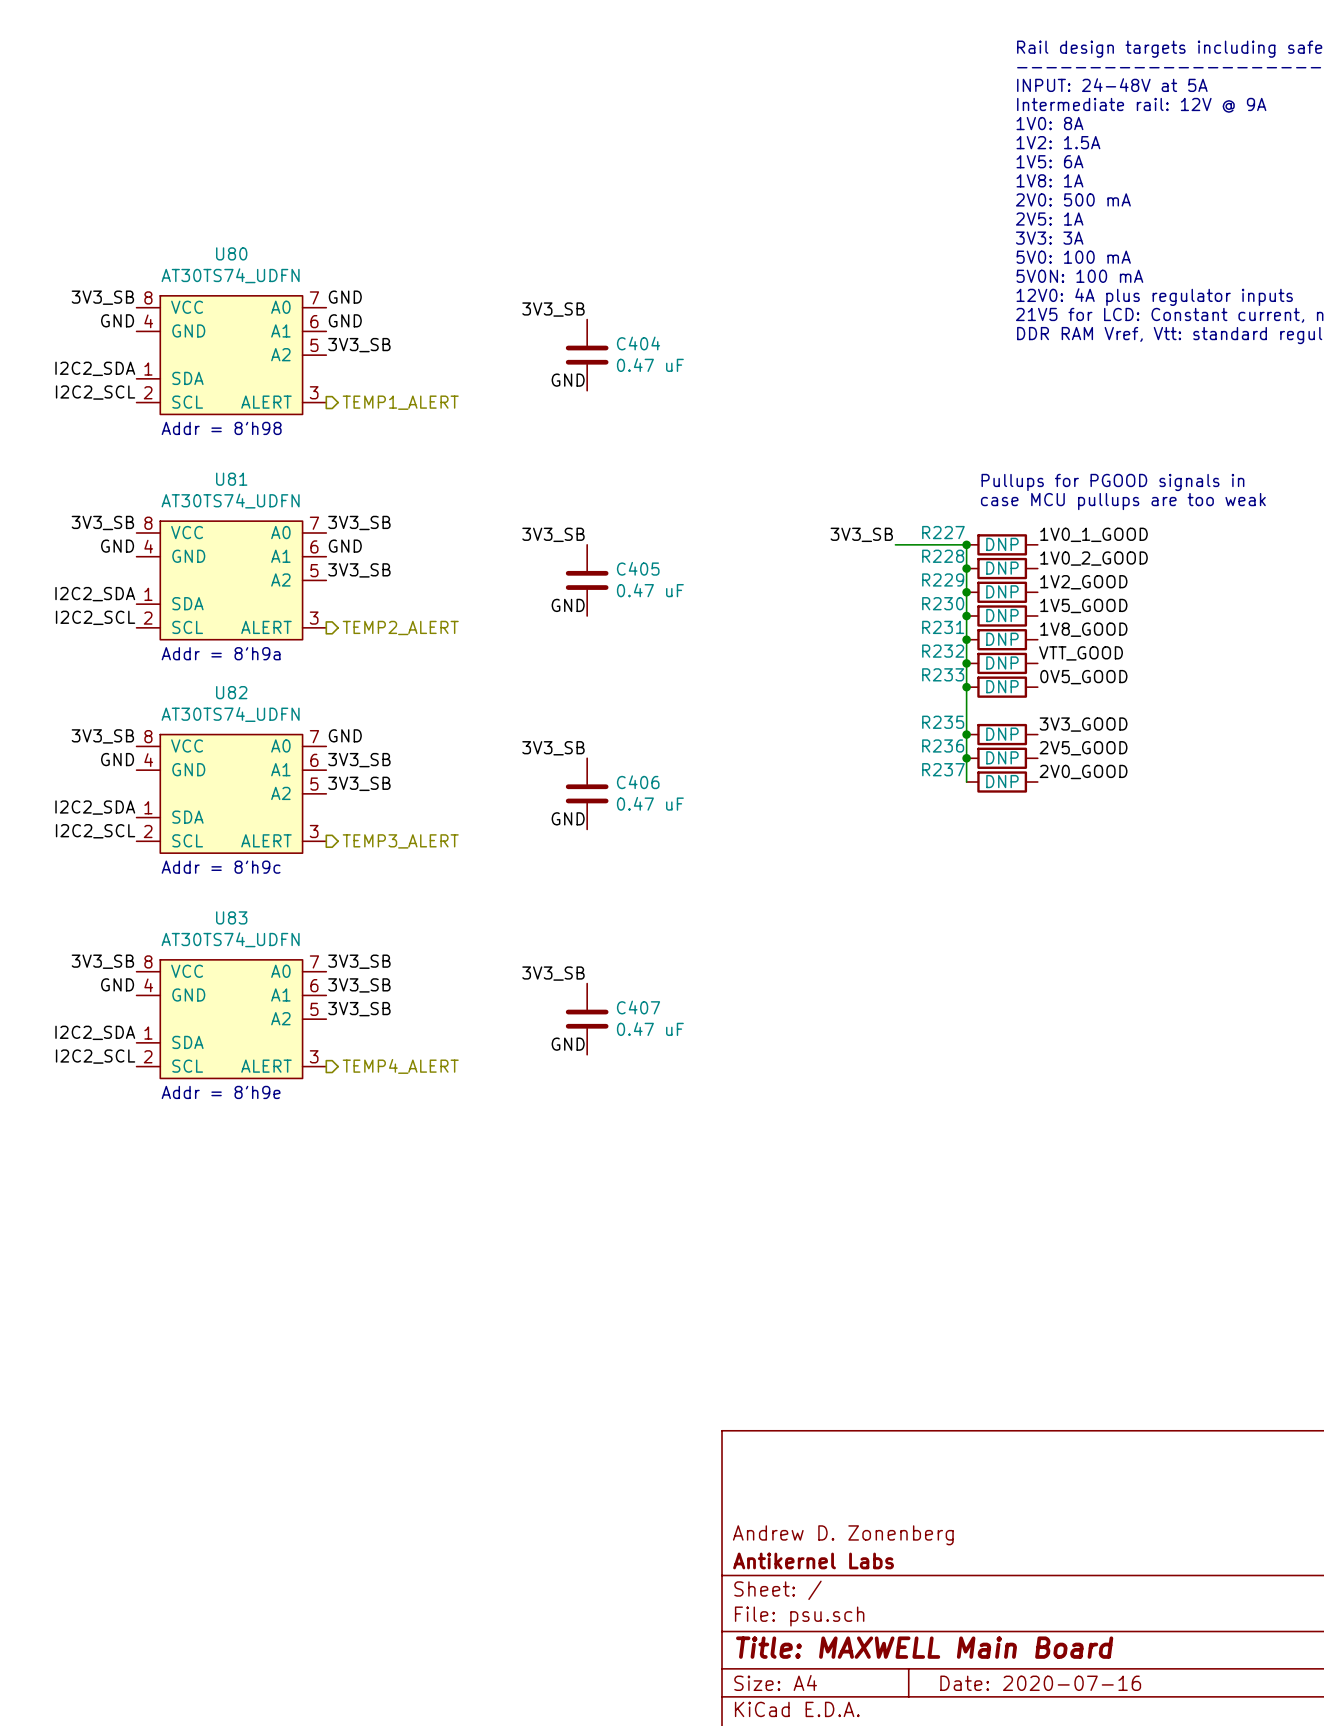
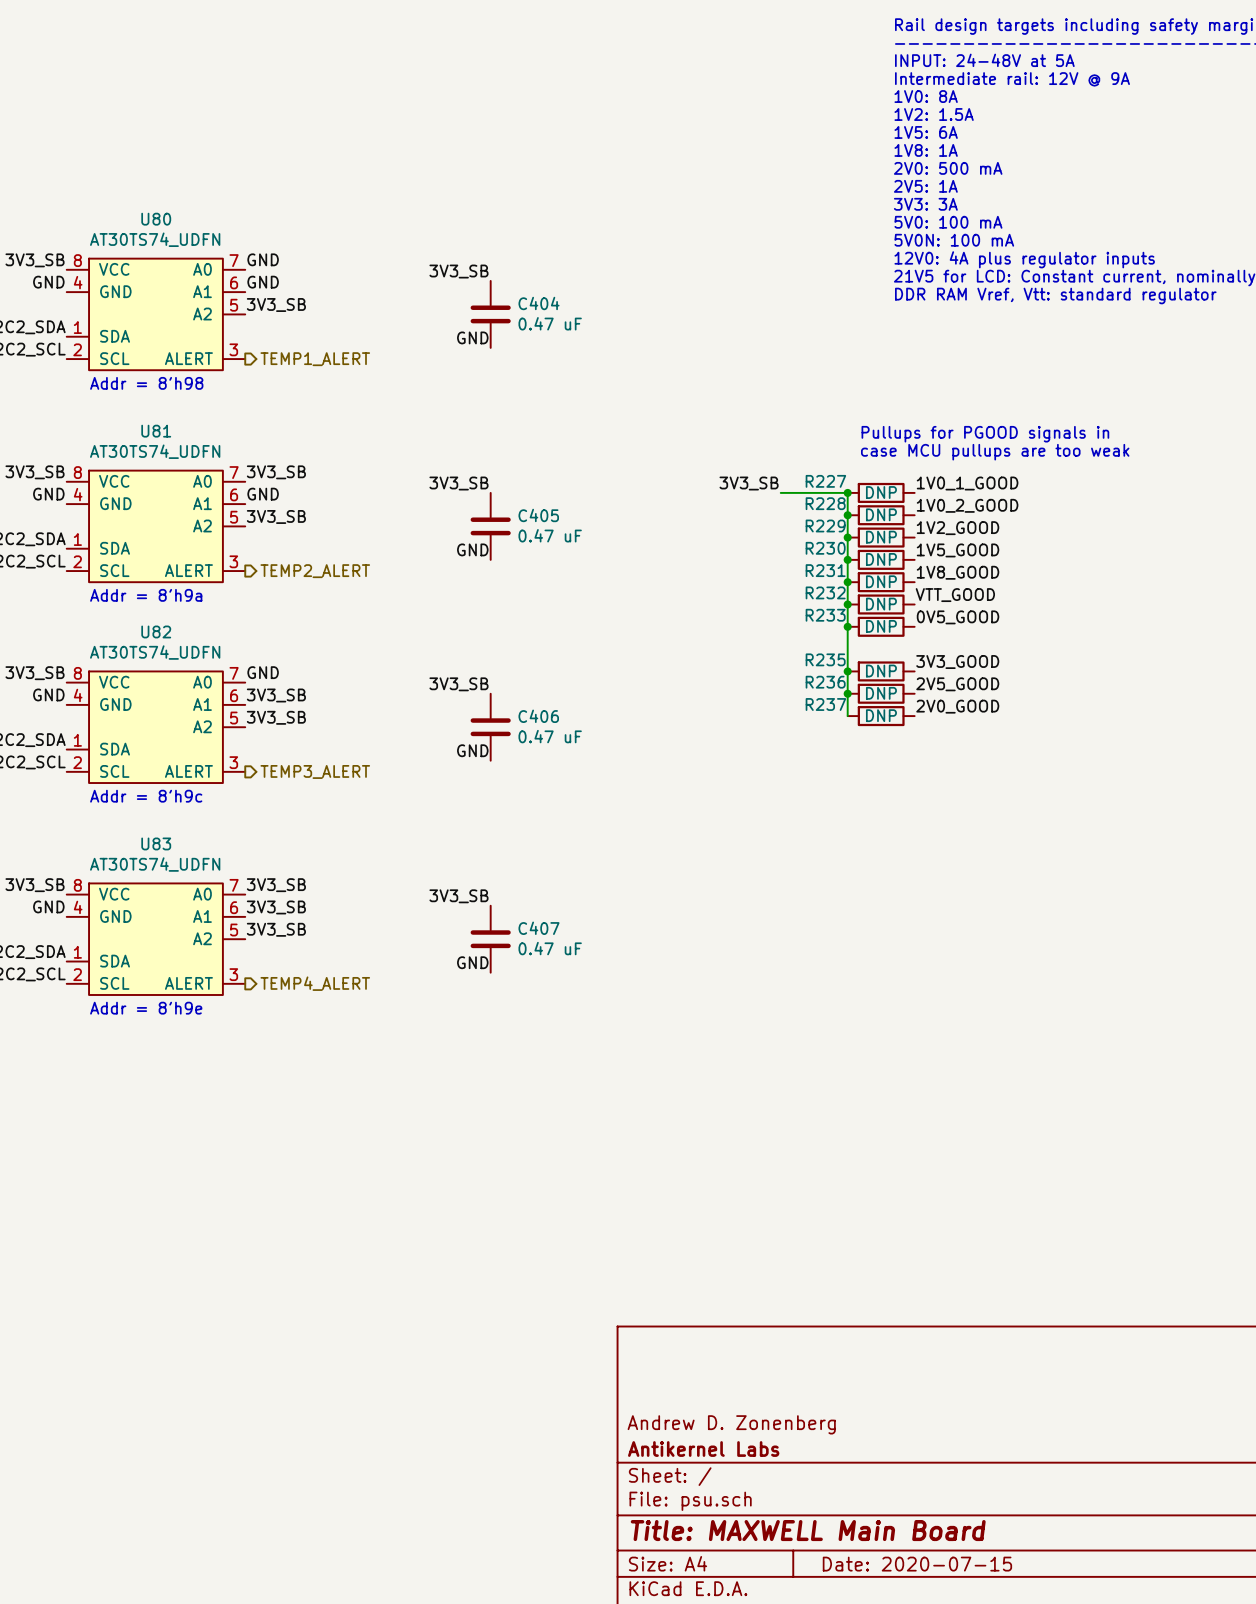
title block: Date: 2020-07-16 (1040, 1683) -> Date: 2020-07-15 (917, 1564)

